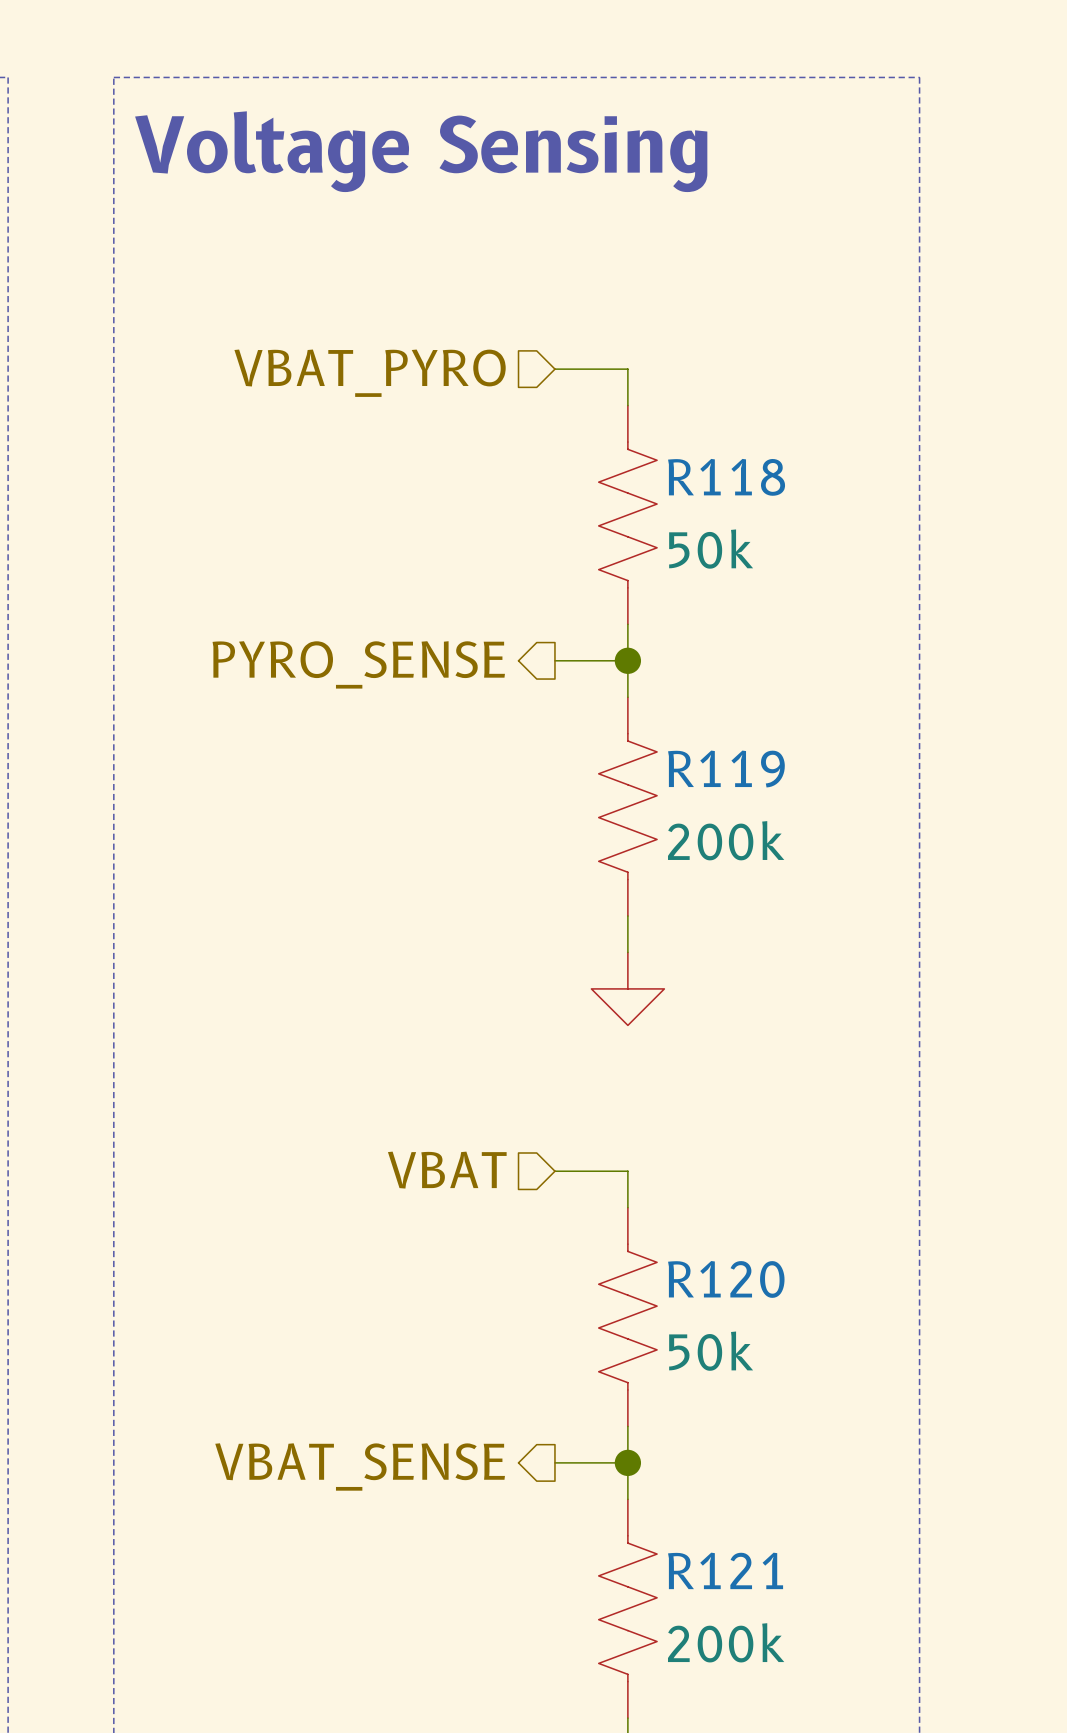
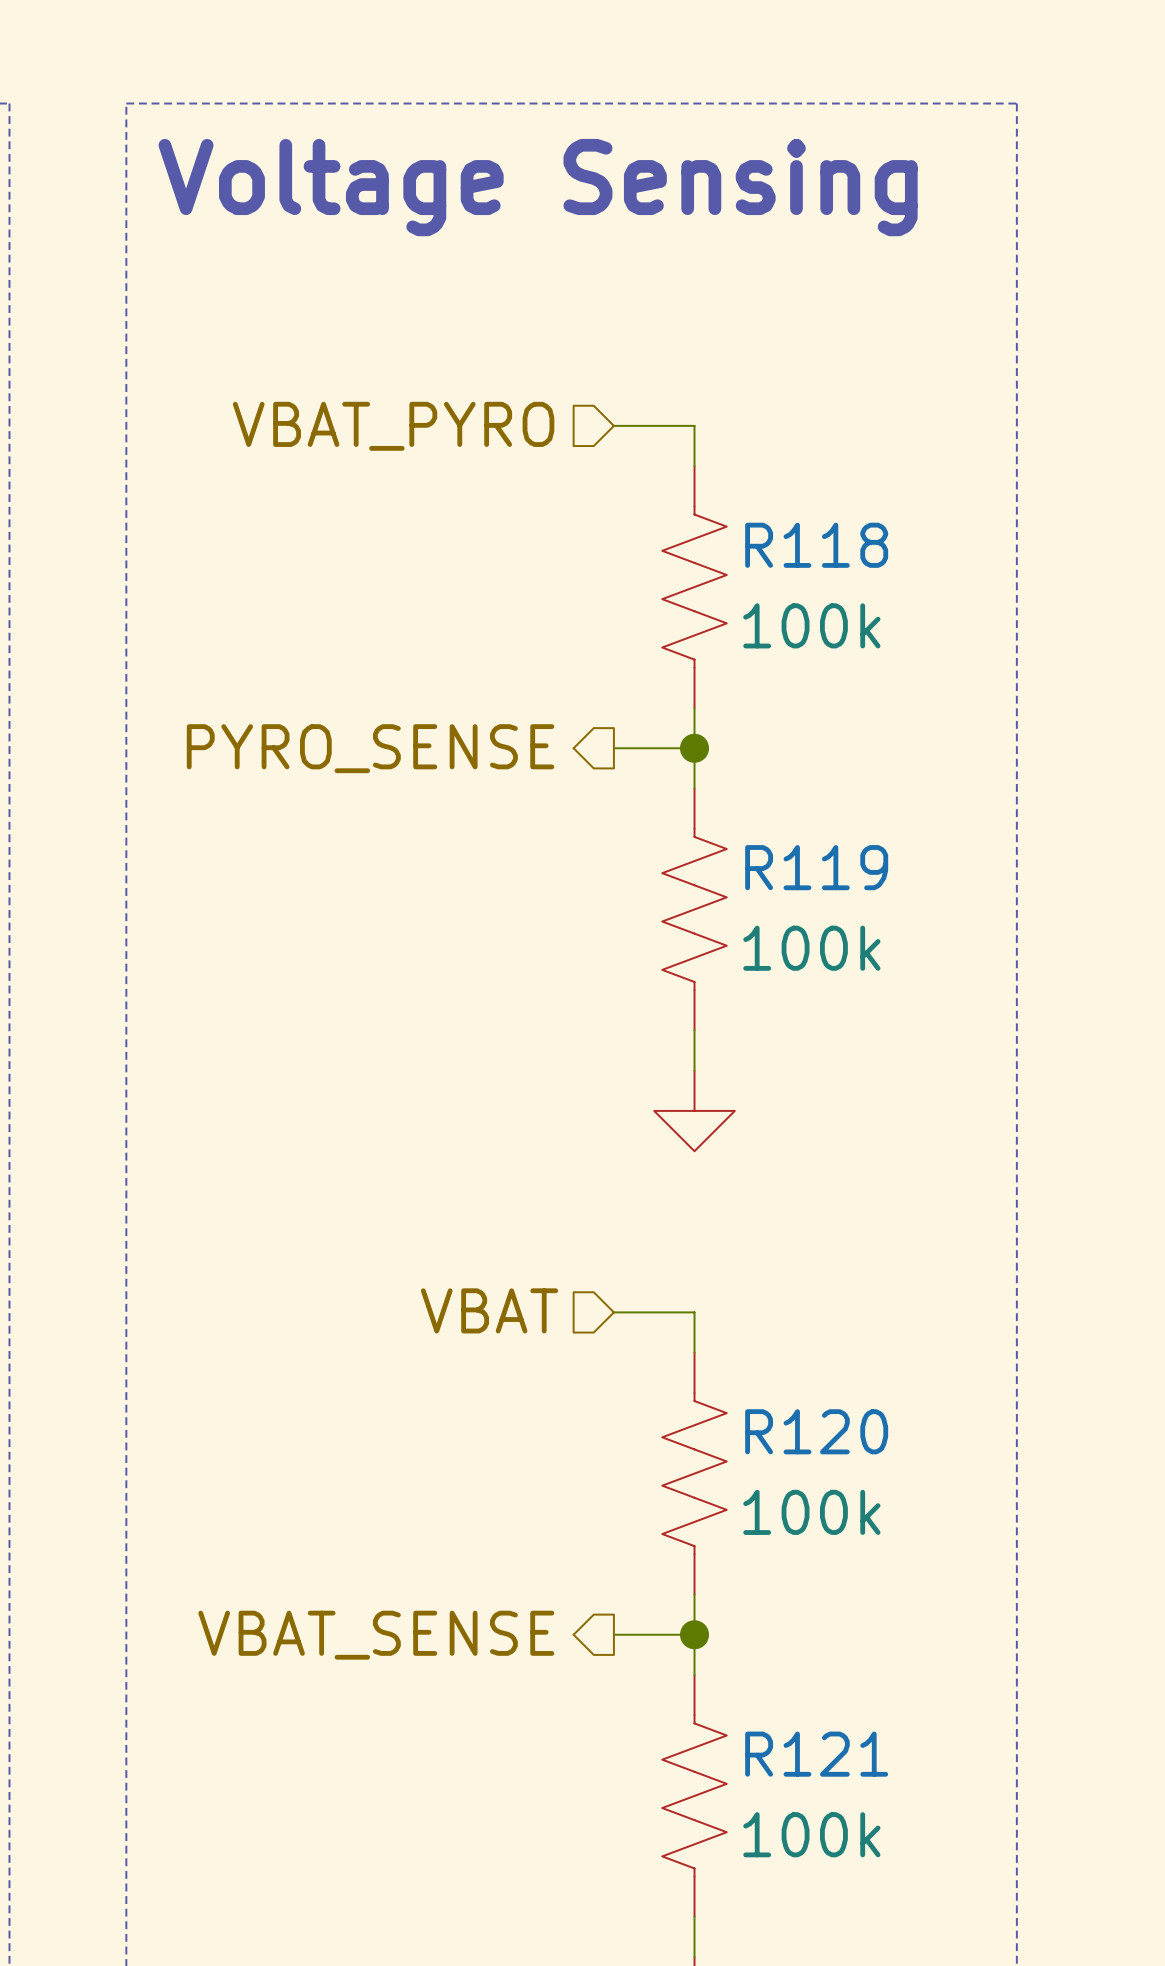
R118 value: 50k (711, 549) -> 100k (811, 625)
R119 value: 200k (726, 840) -> 100k (811, 948)
R120 value: 50k (711, 1351) -> 100k (811, 1512)
R121 value: 200k (726, 1642) -> 100k (811, 1834)

